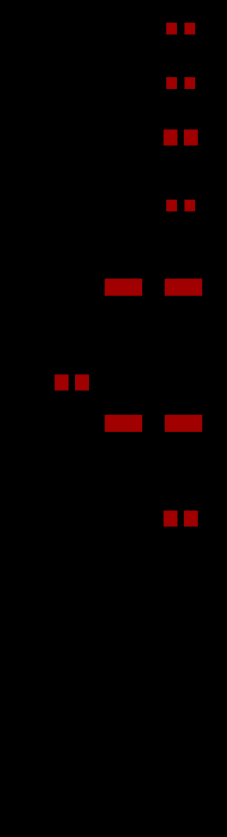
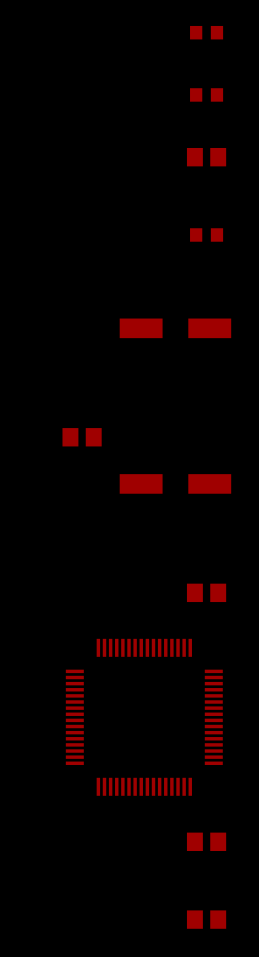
part: none -> (144, 717)
part: none -> (206, 841)
part: none -> (206, 919)

